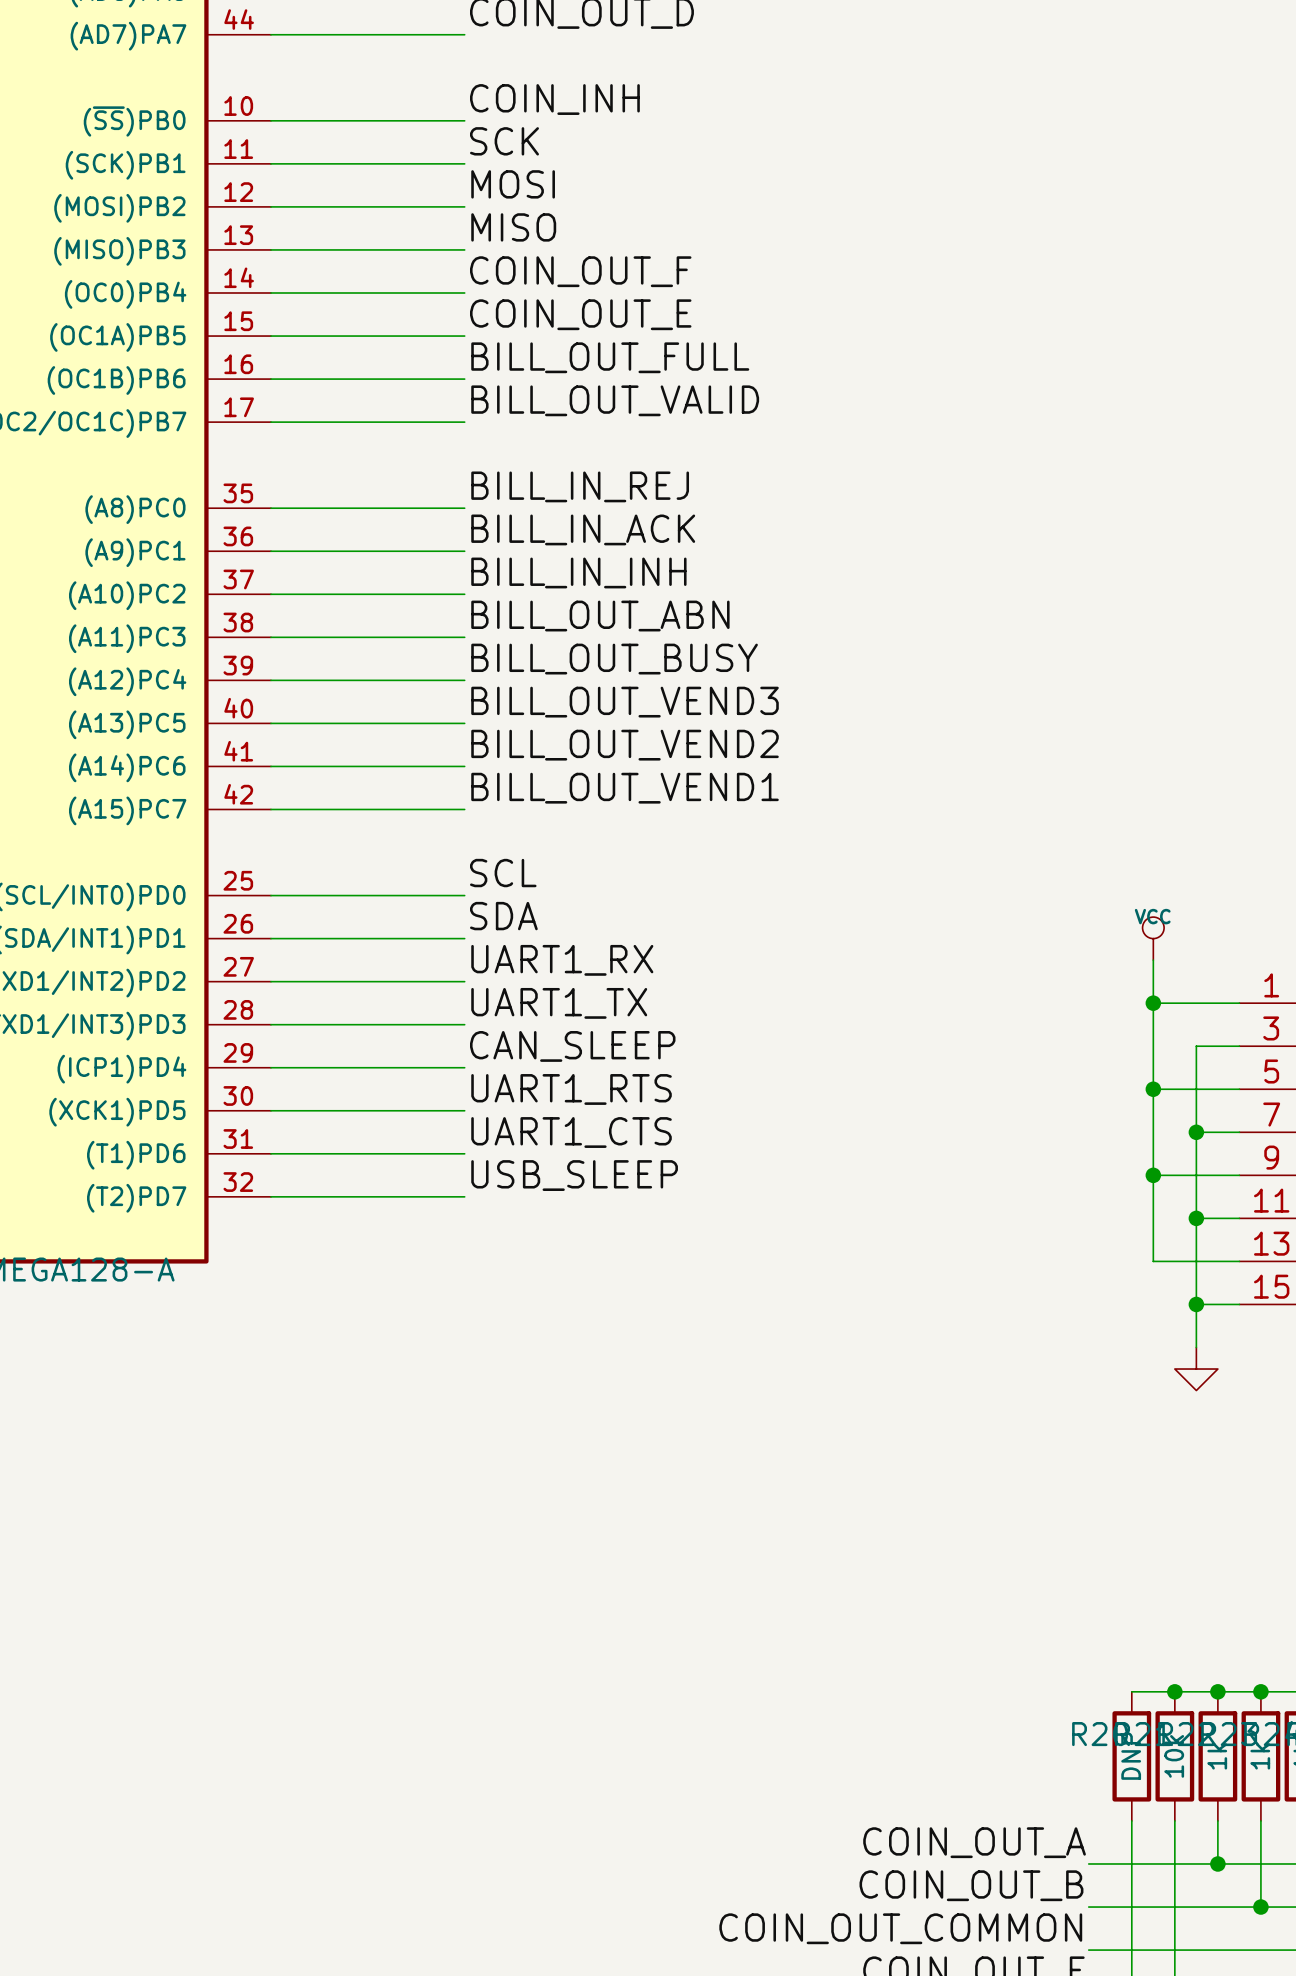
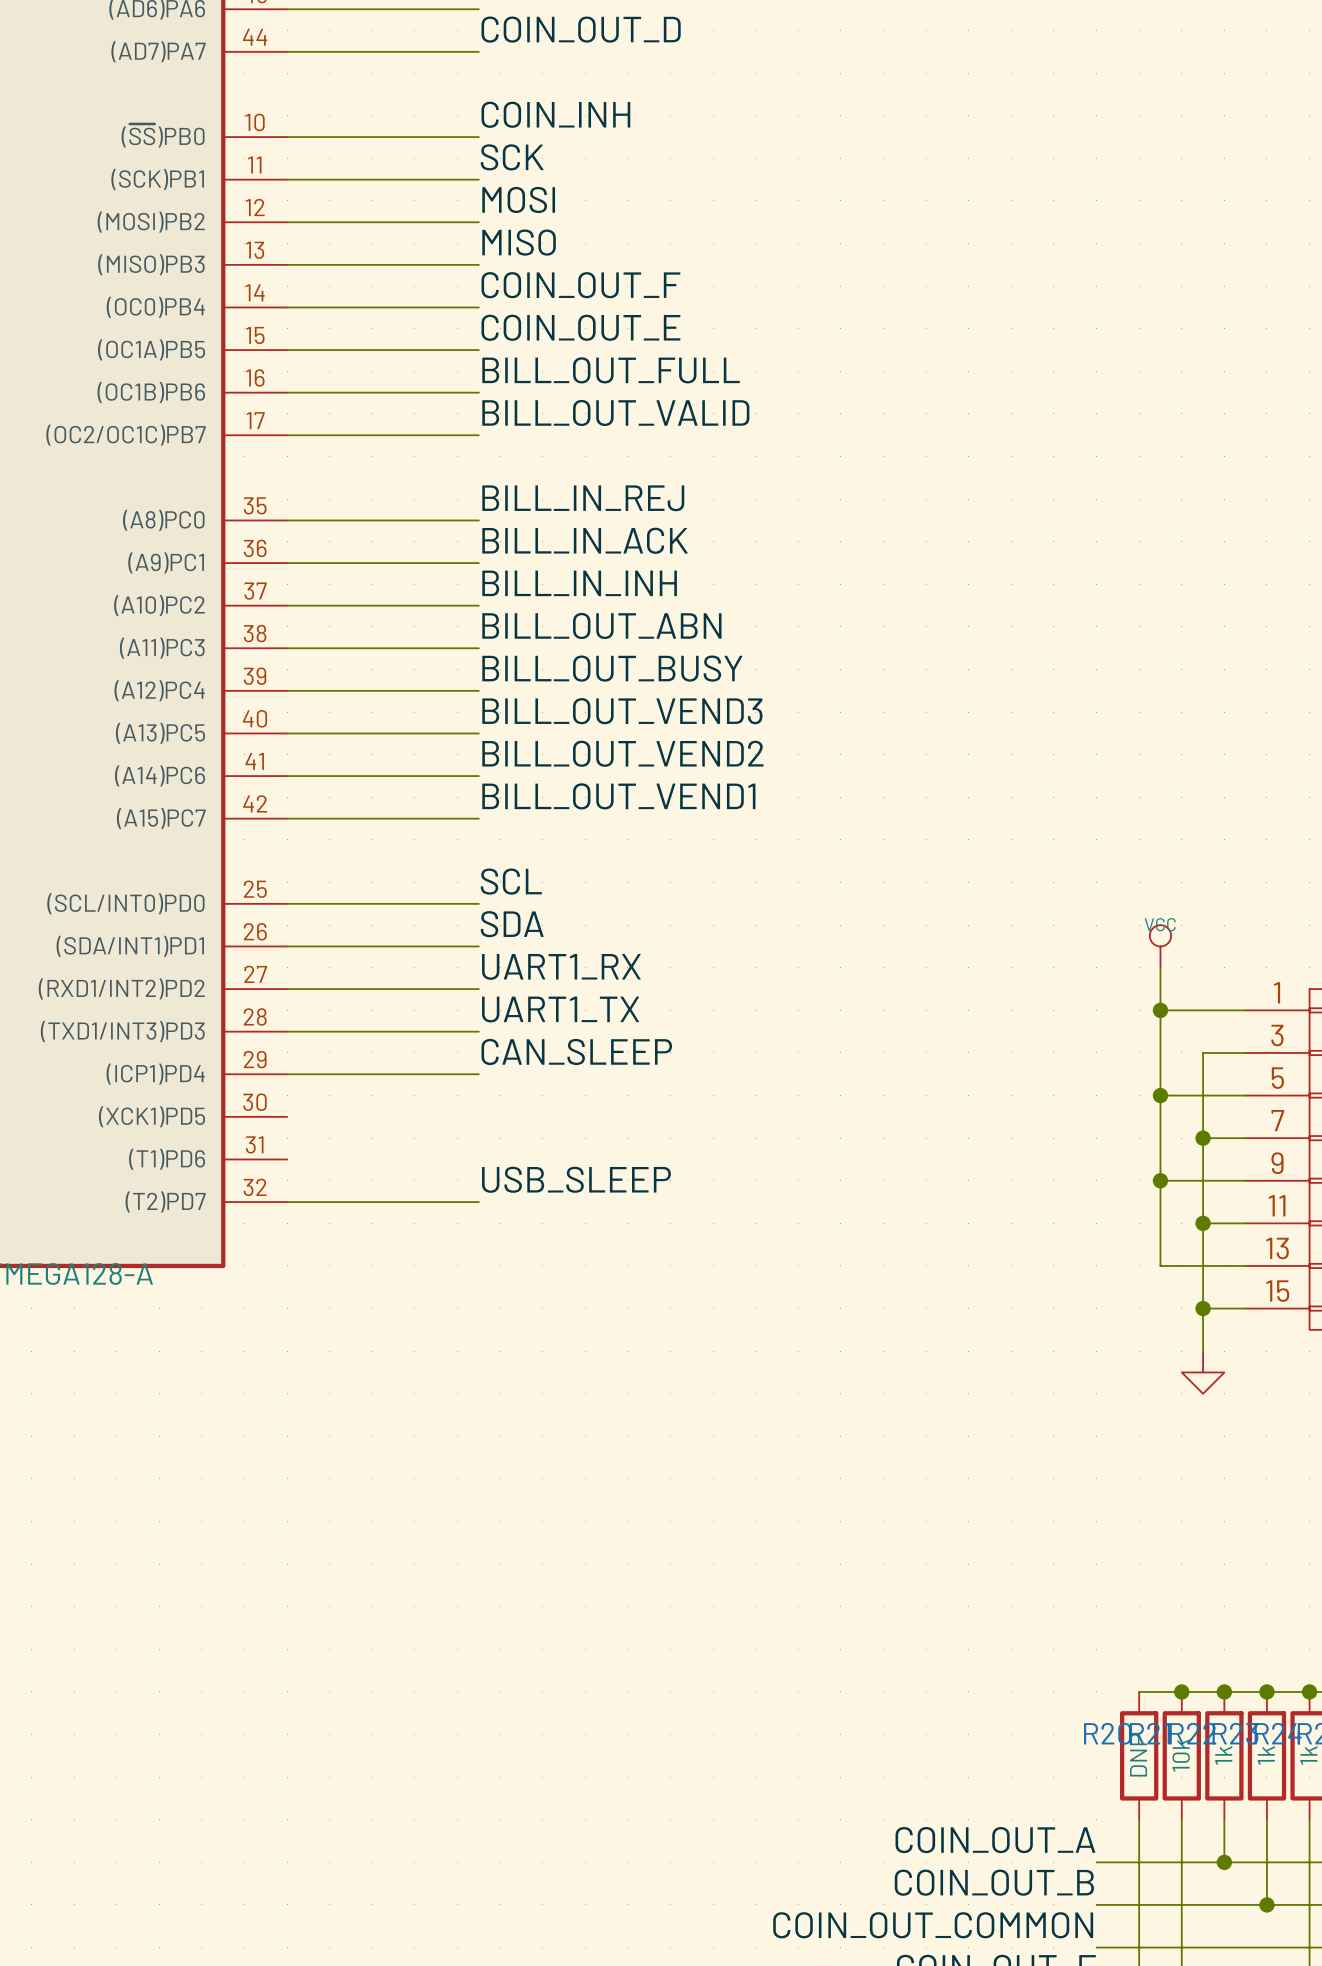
label: UART1_RTS (571, 1089) -> none
wire: (270, 1110) (464, 1110) -> none
label: UART1_CTS (571, 1132) -> none
wire: (270, 1153) (464, 1153) -> none

